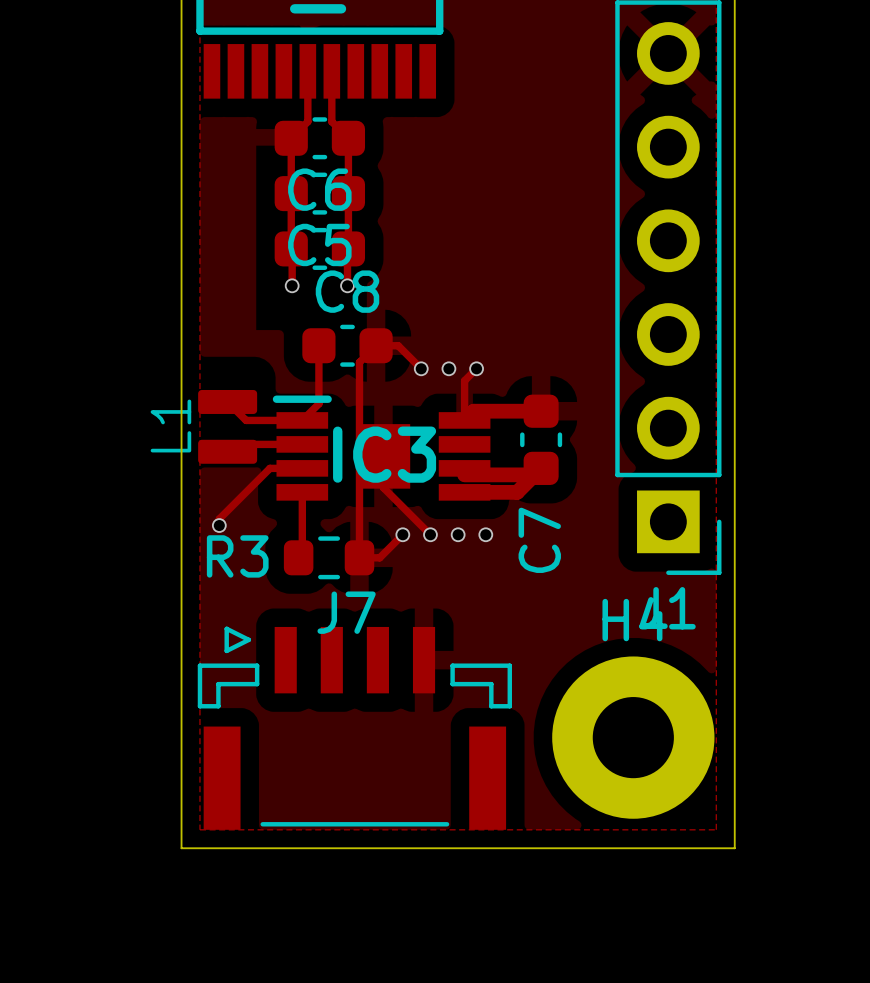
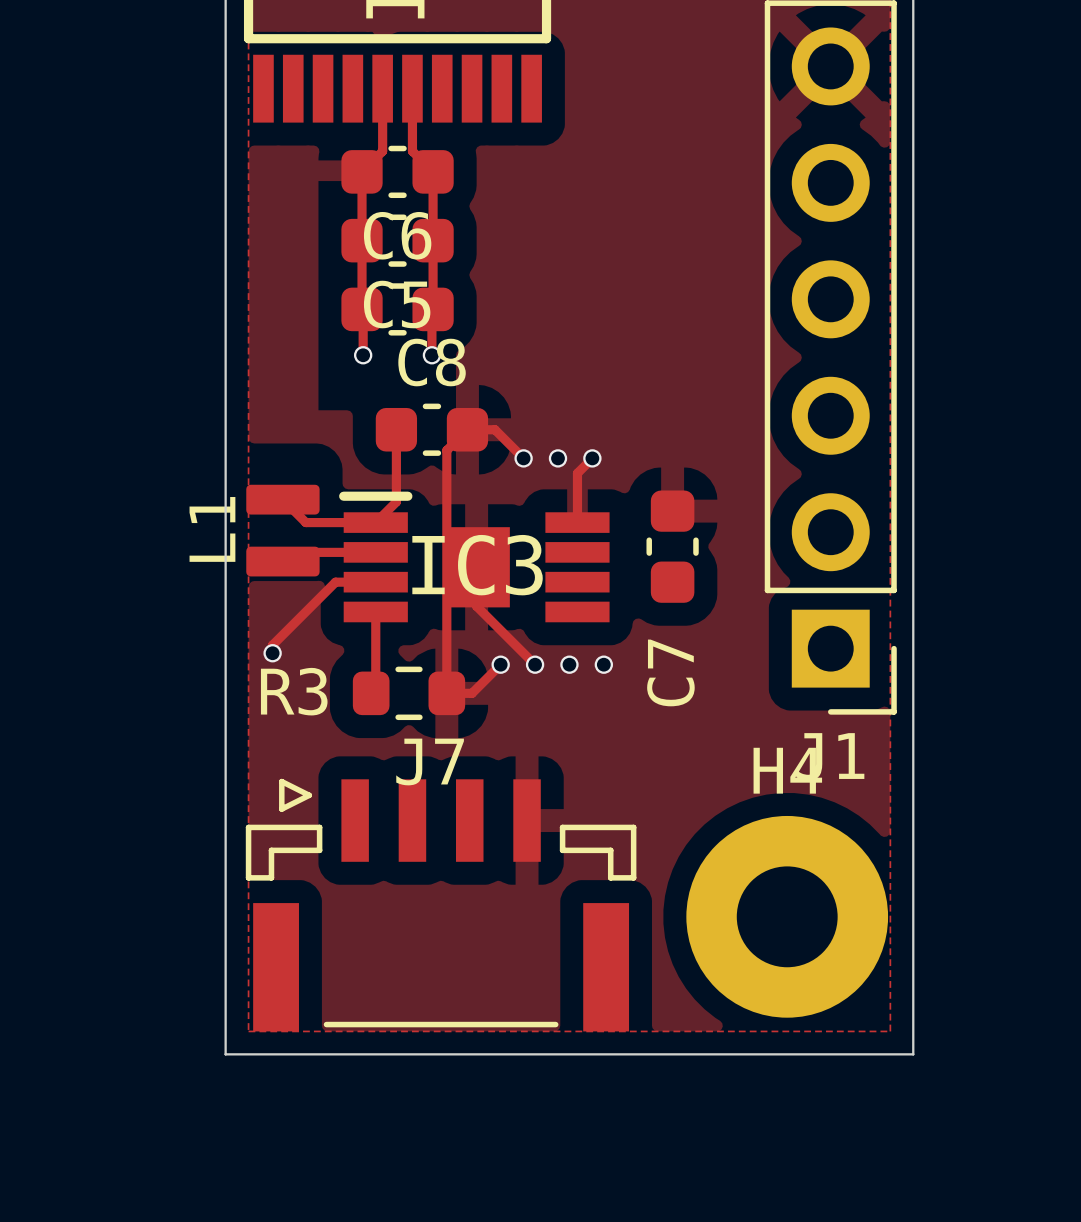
track: (541, 411) (473, 411) (464, 420) -> none
track: (541, 468) (517, 492) (464, 492) -> none
track: (464, 474) (534, 474) -> none

